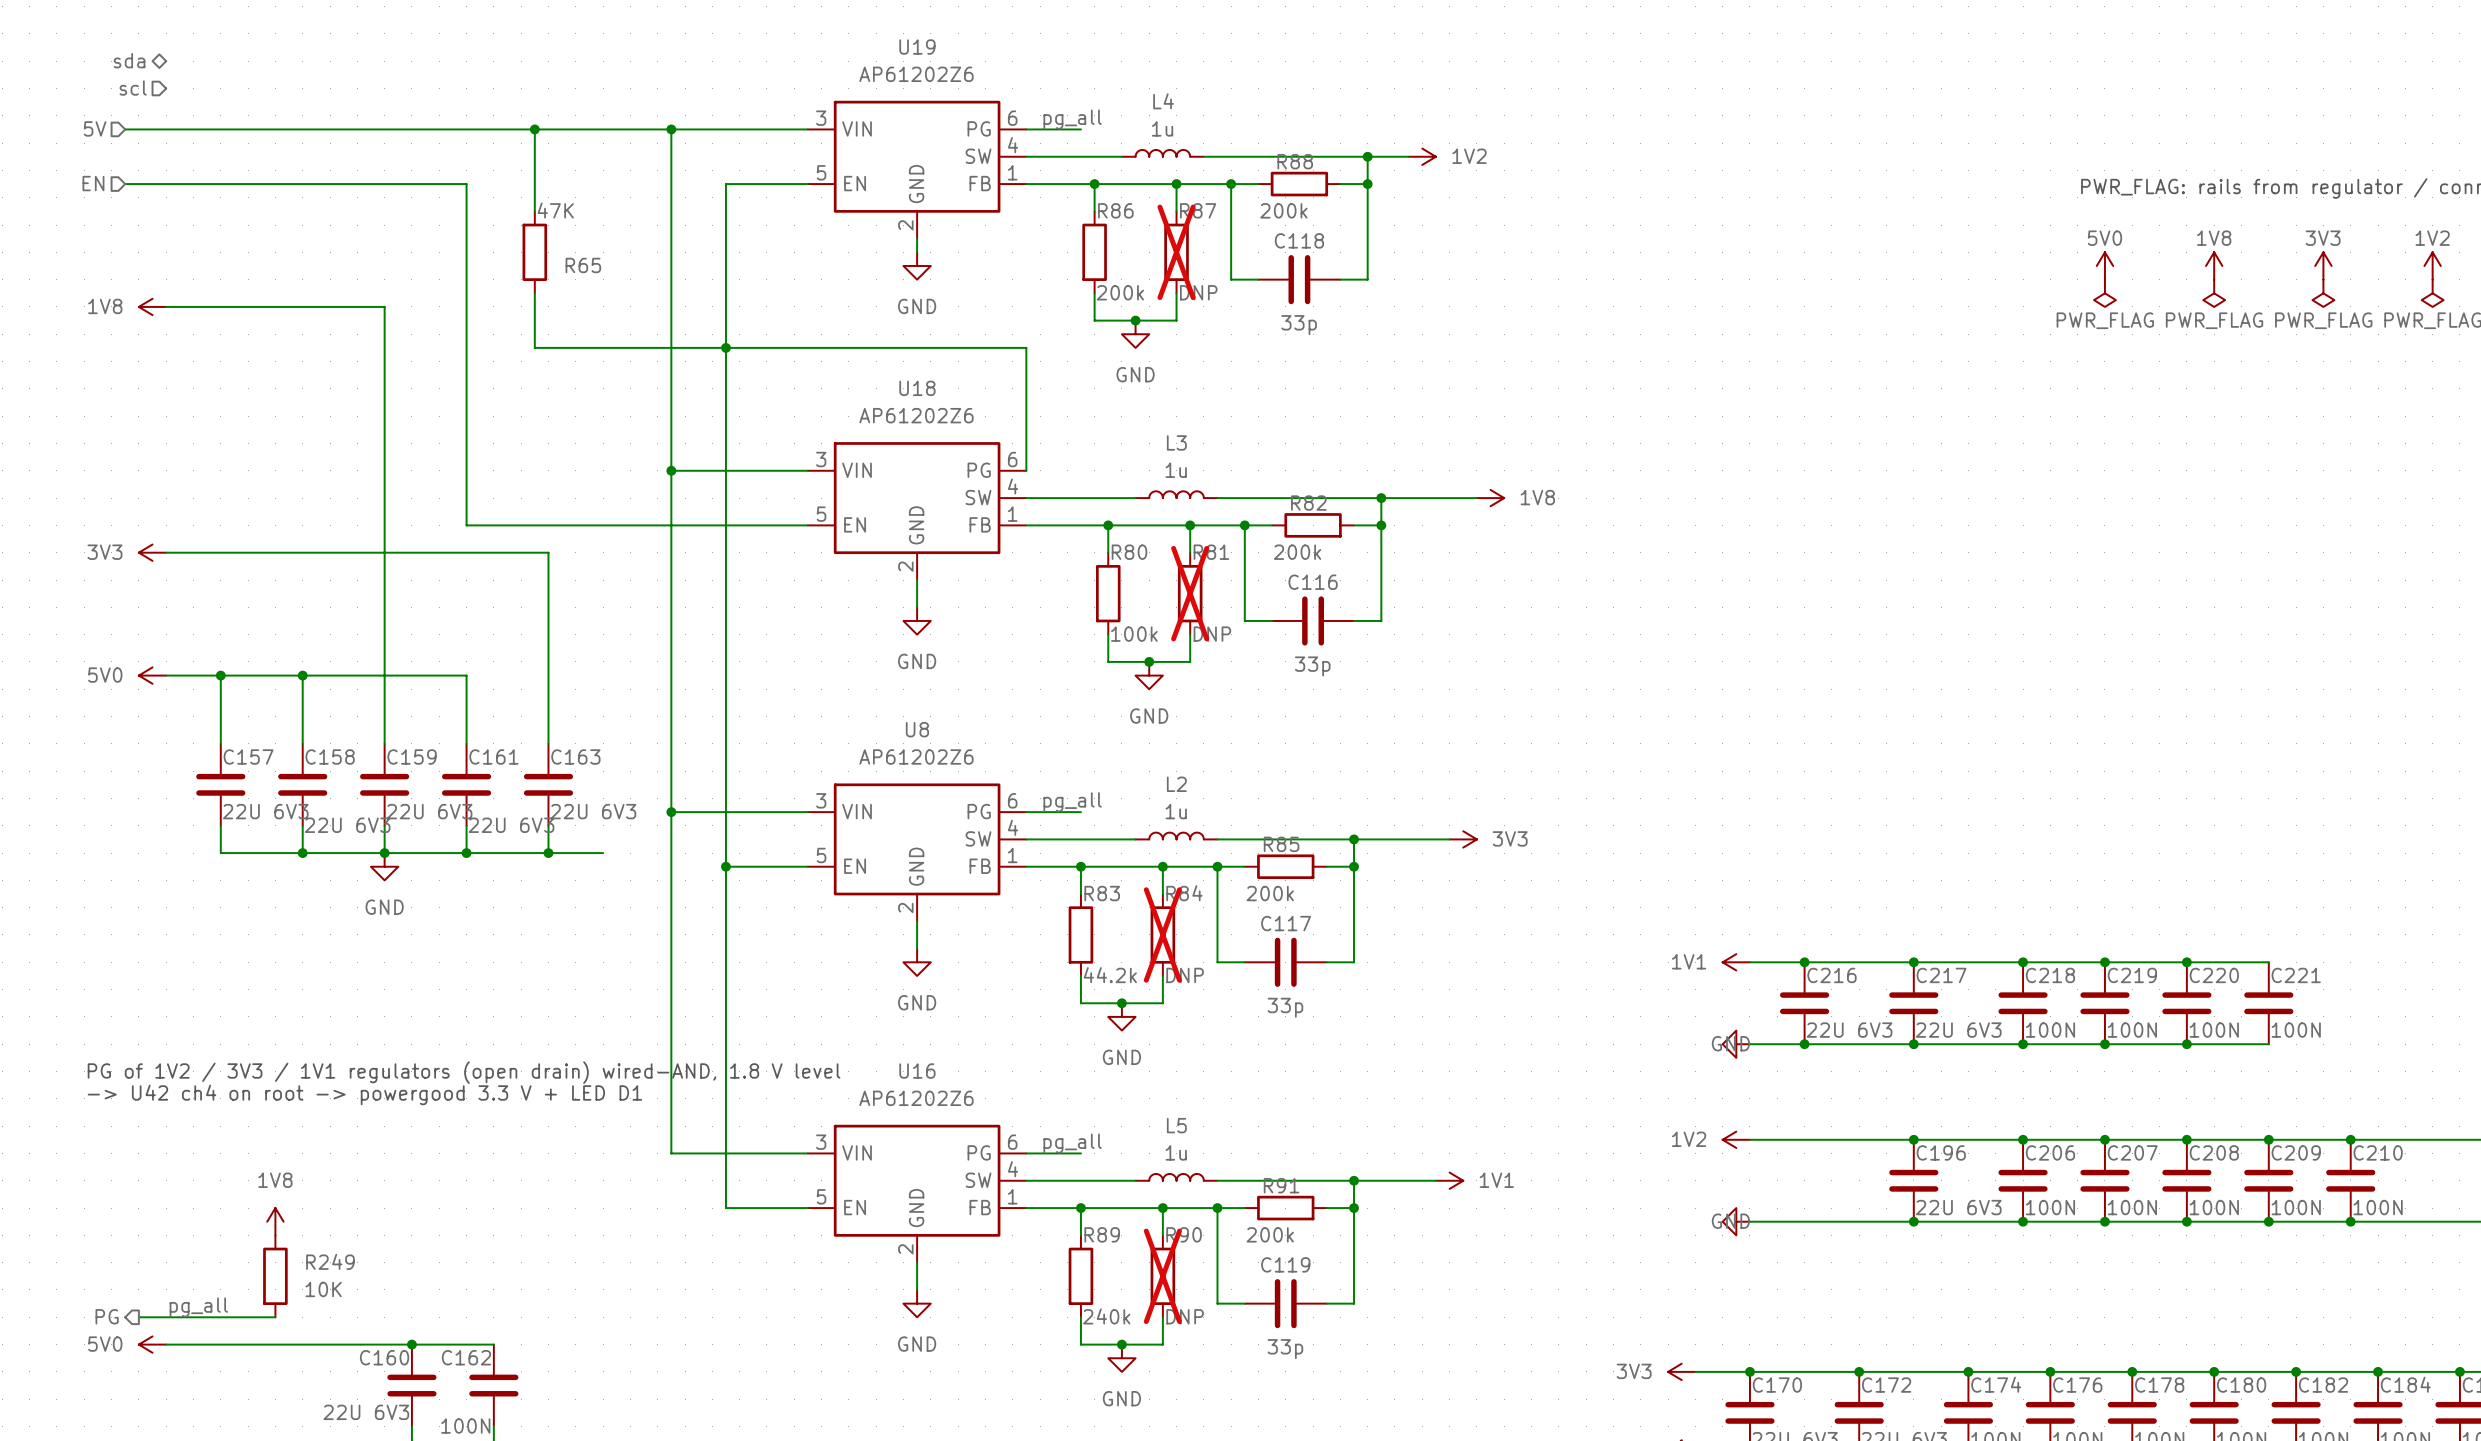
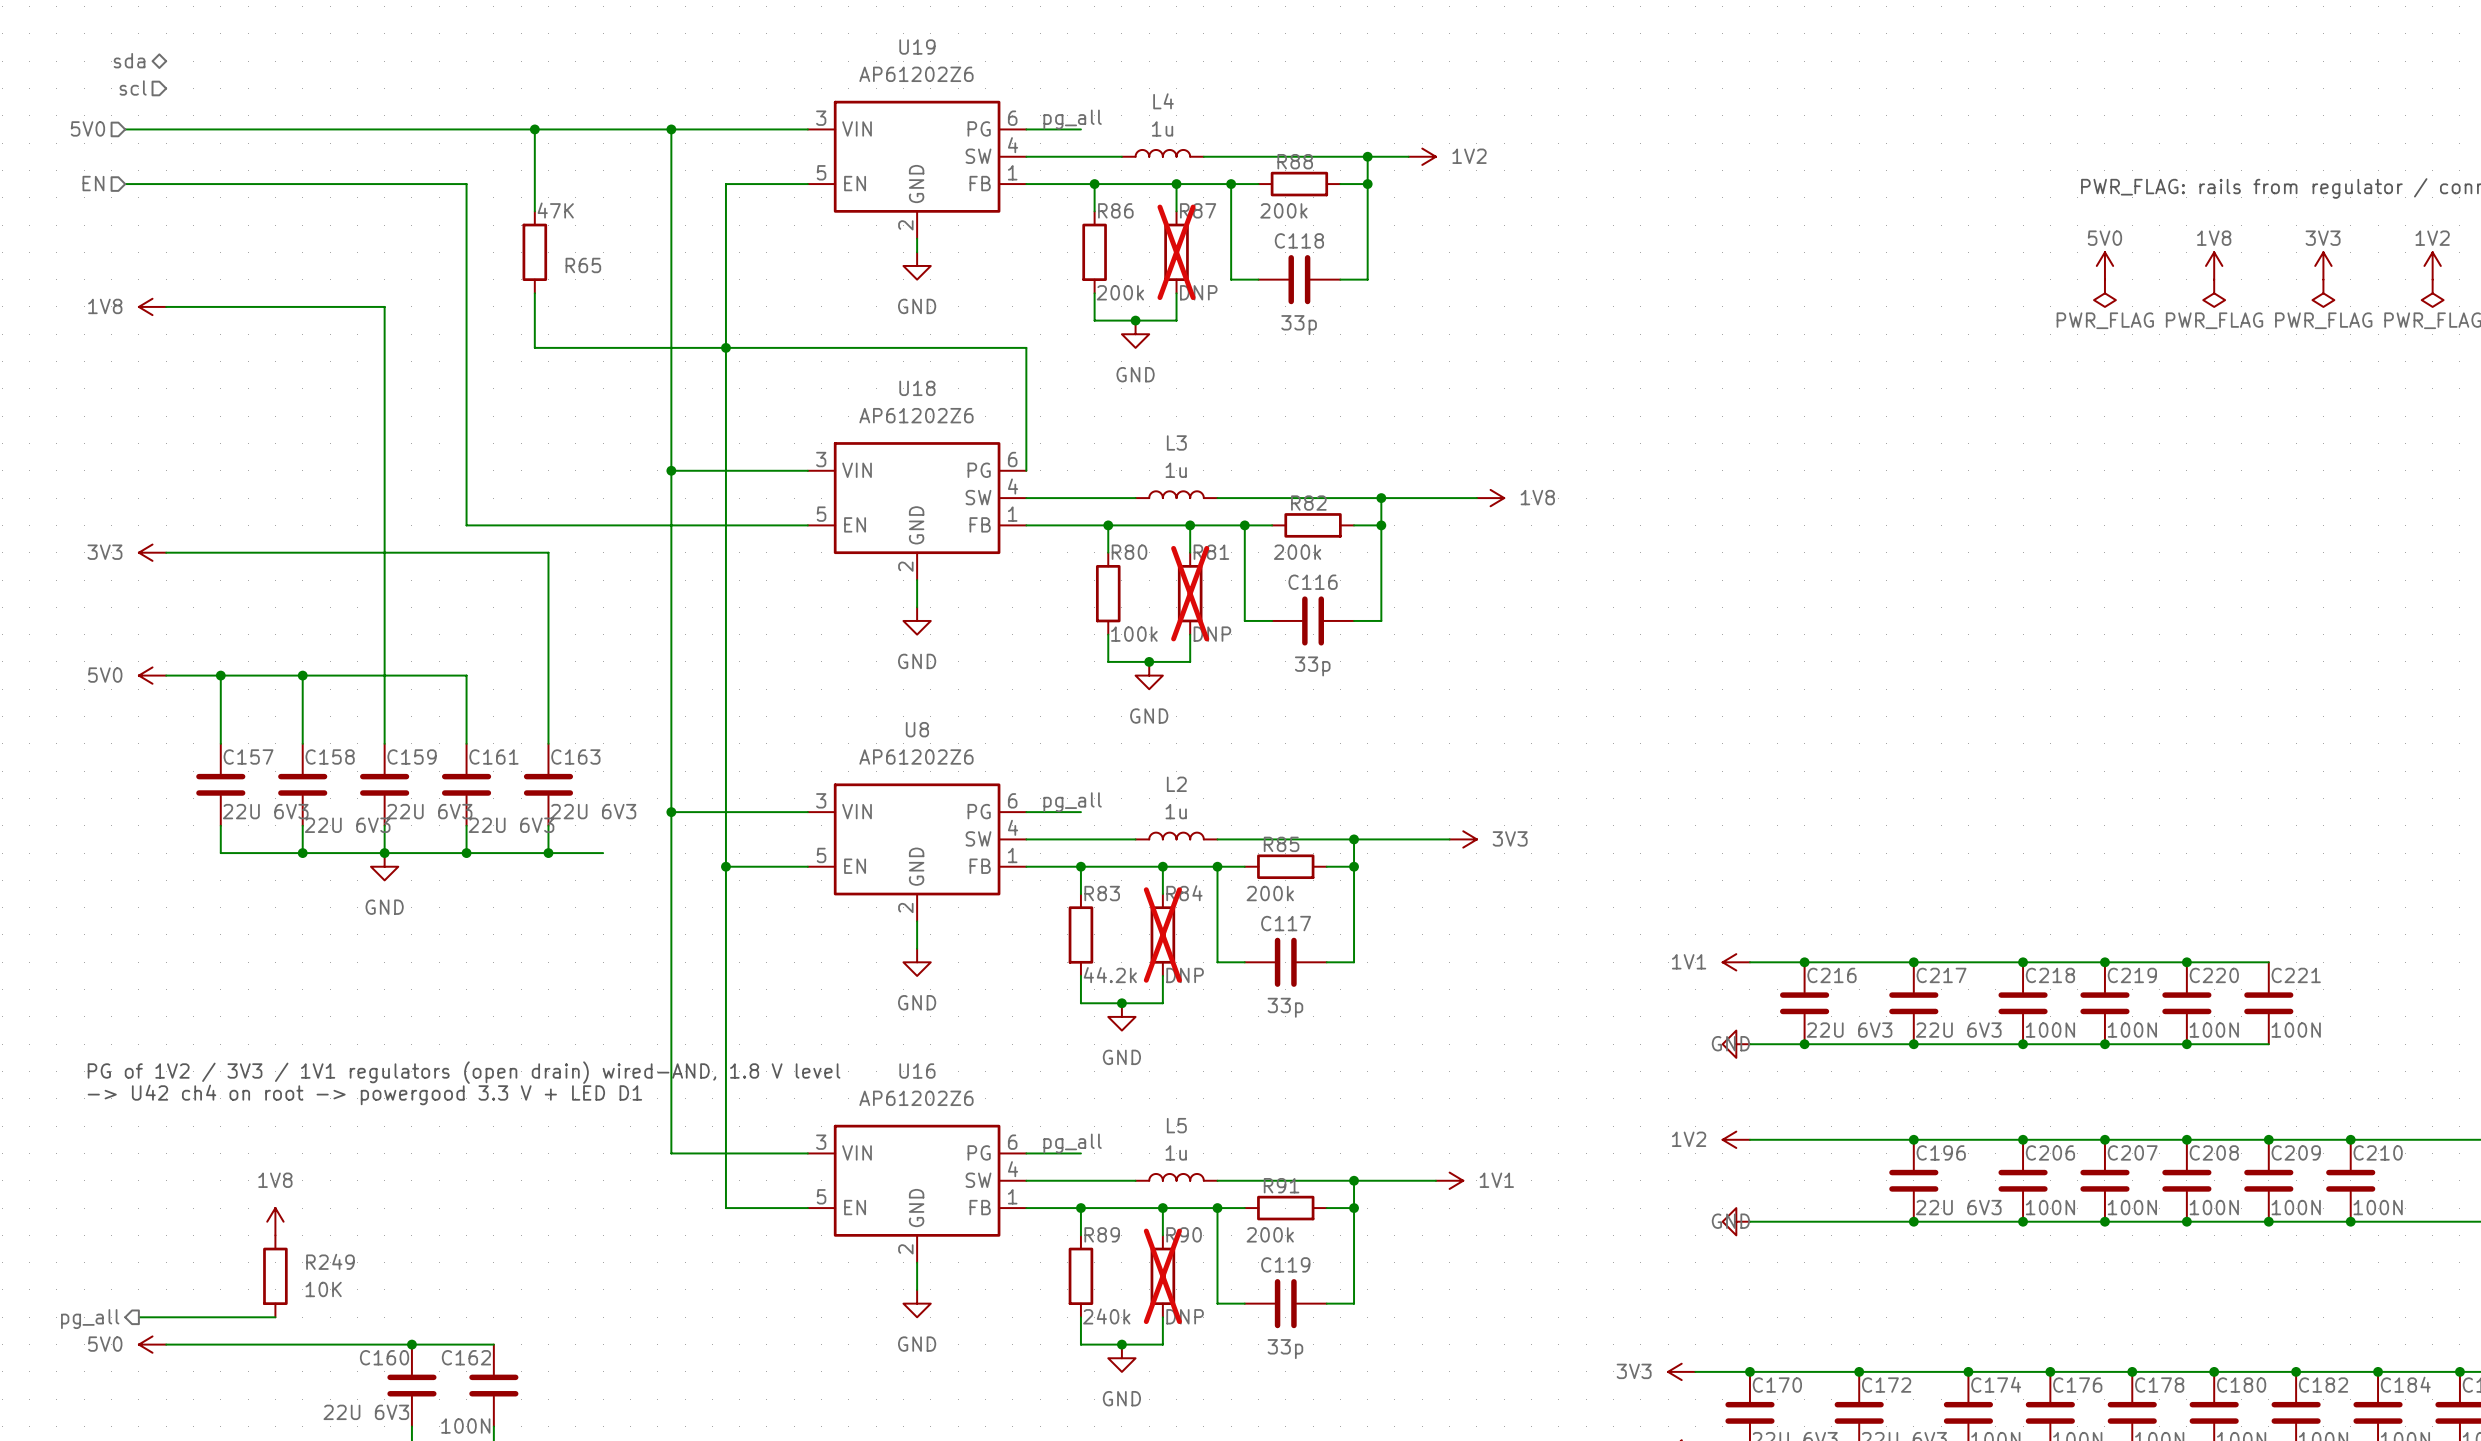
hierarchical label: 5V (95, 128) -> 5V0 (87, 128)
label: pg_all (198, 1307) -> none
hierarchical label: PG (107, 1316) -> pg_all (90, 1319)

